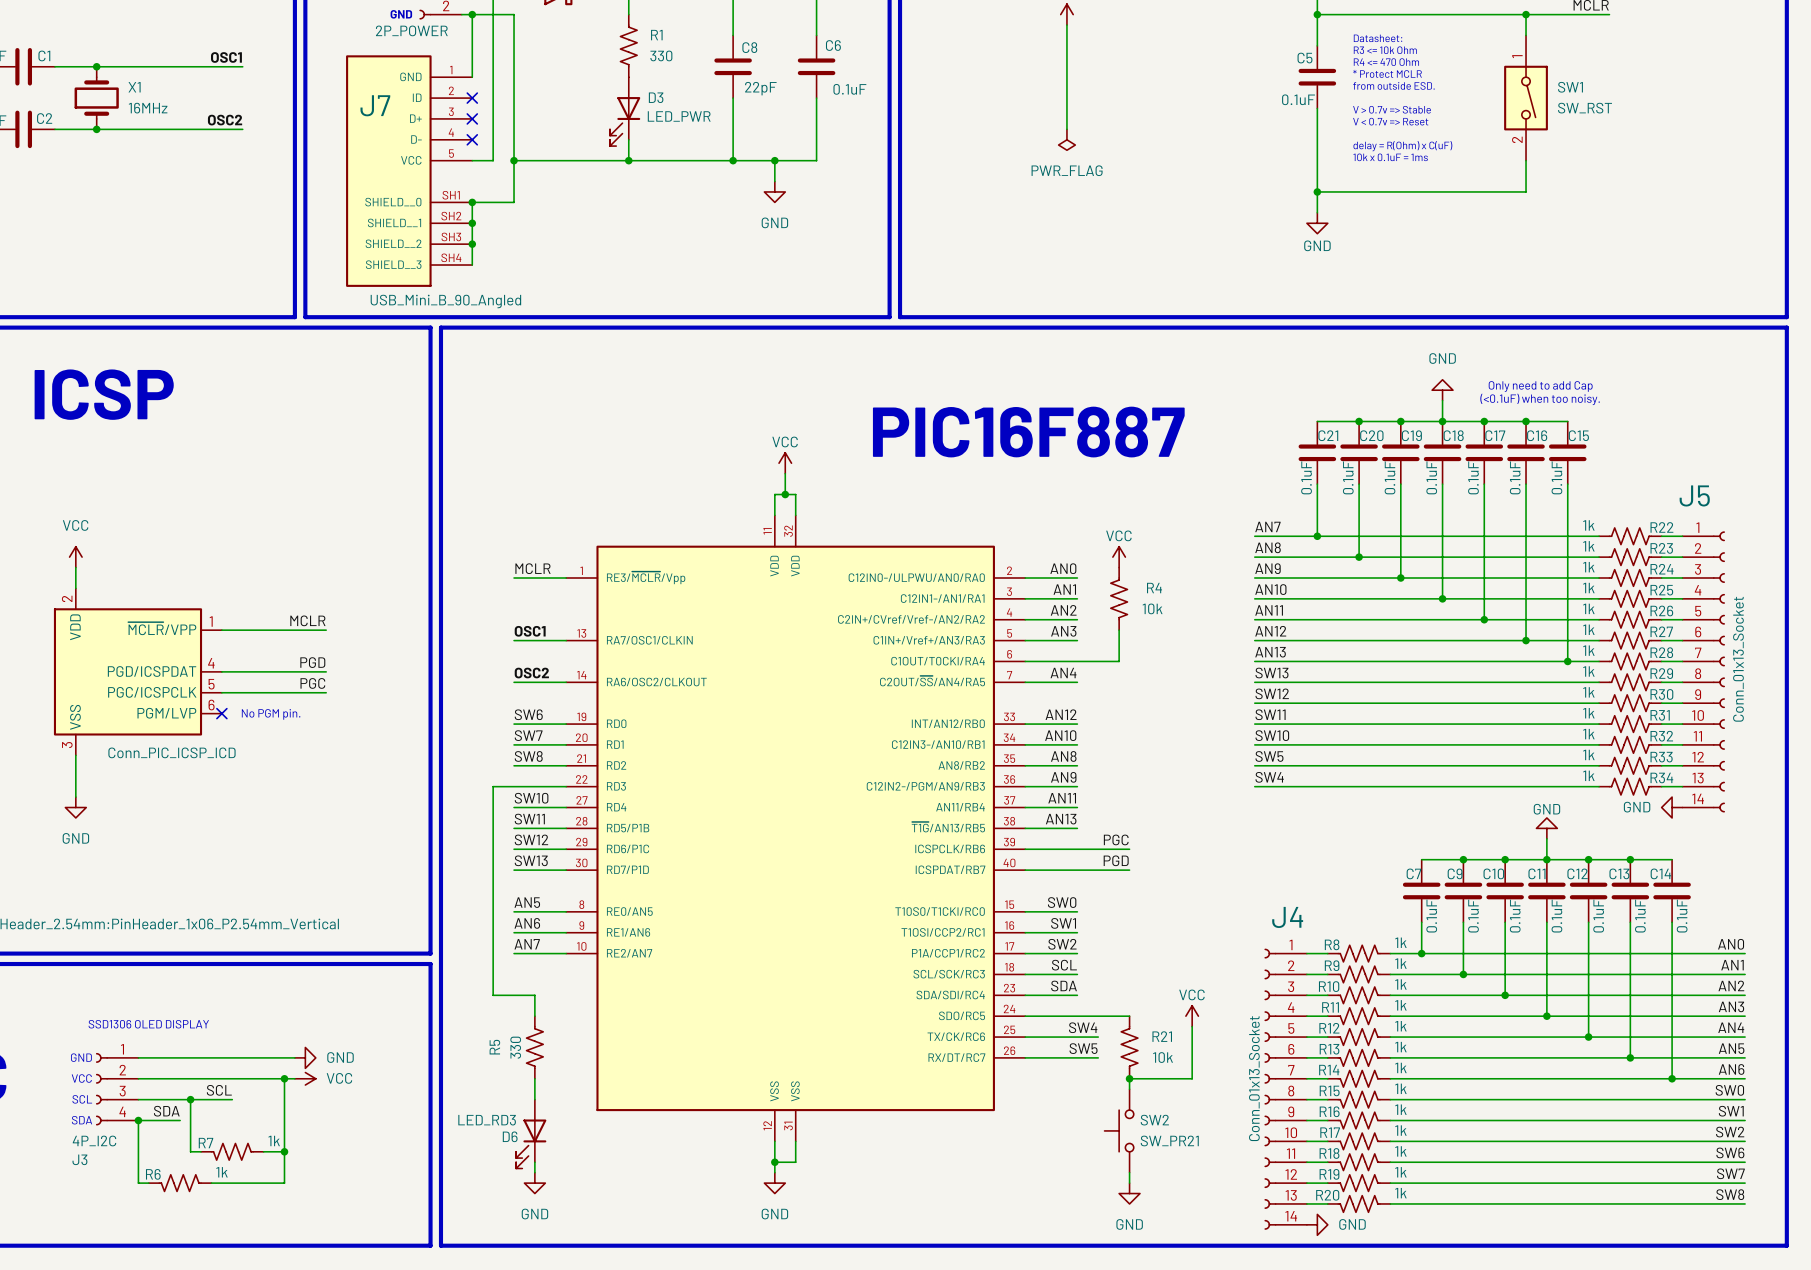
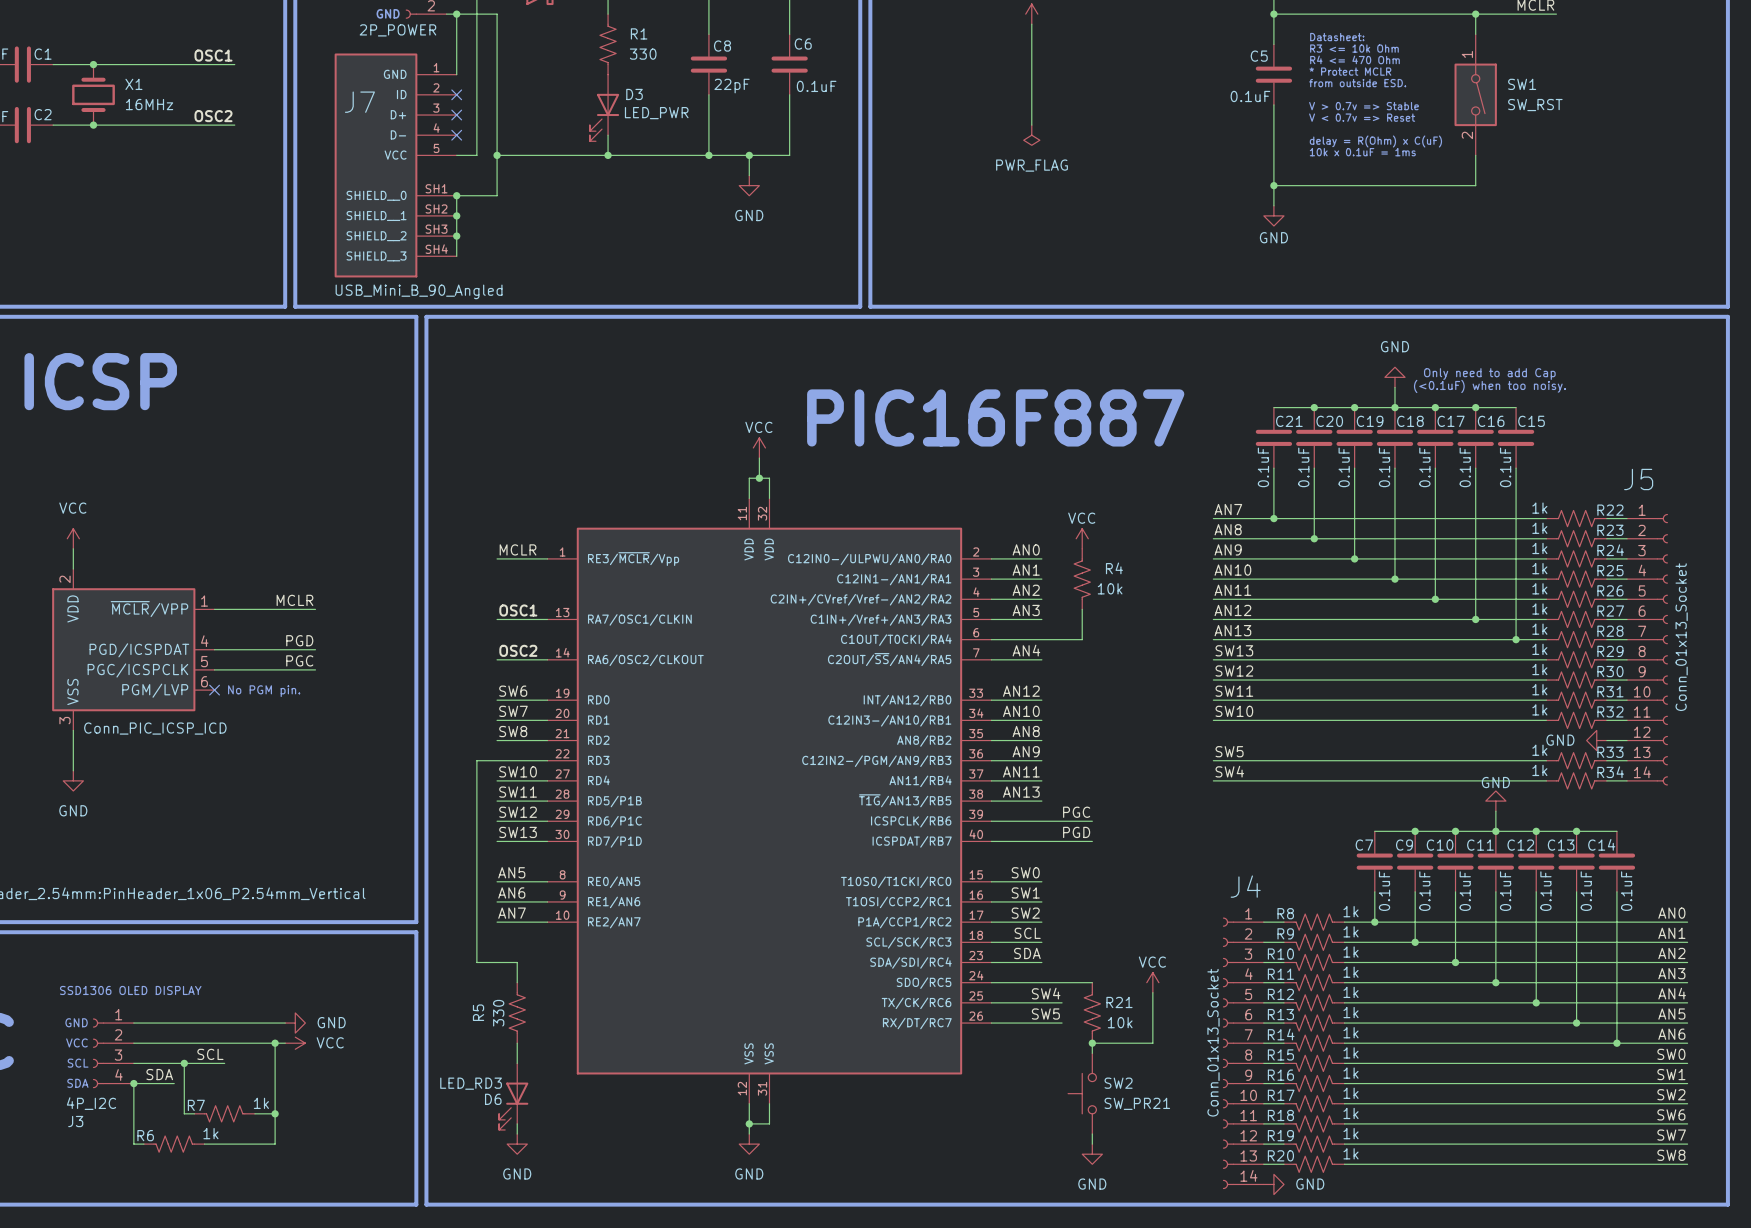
label: SW5 (1269, 756) -> none
wire: (1254, 765) (1599, 765) -> (1213, 780) (1546, 780)
R33: 1k (1630, 765) -> none
label: SW4 (1269, 777) -> SW5 (1229, 751)
R34 name: R34 (1661, 777) -> R33 (1610, 752)
label: none -> SW4 (1229, 771)
R34: none -> 1k (1576, 780)
power symbol position: GND (1672, 807) -> GND (1596, 740)

